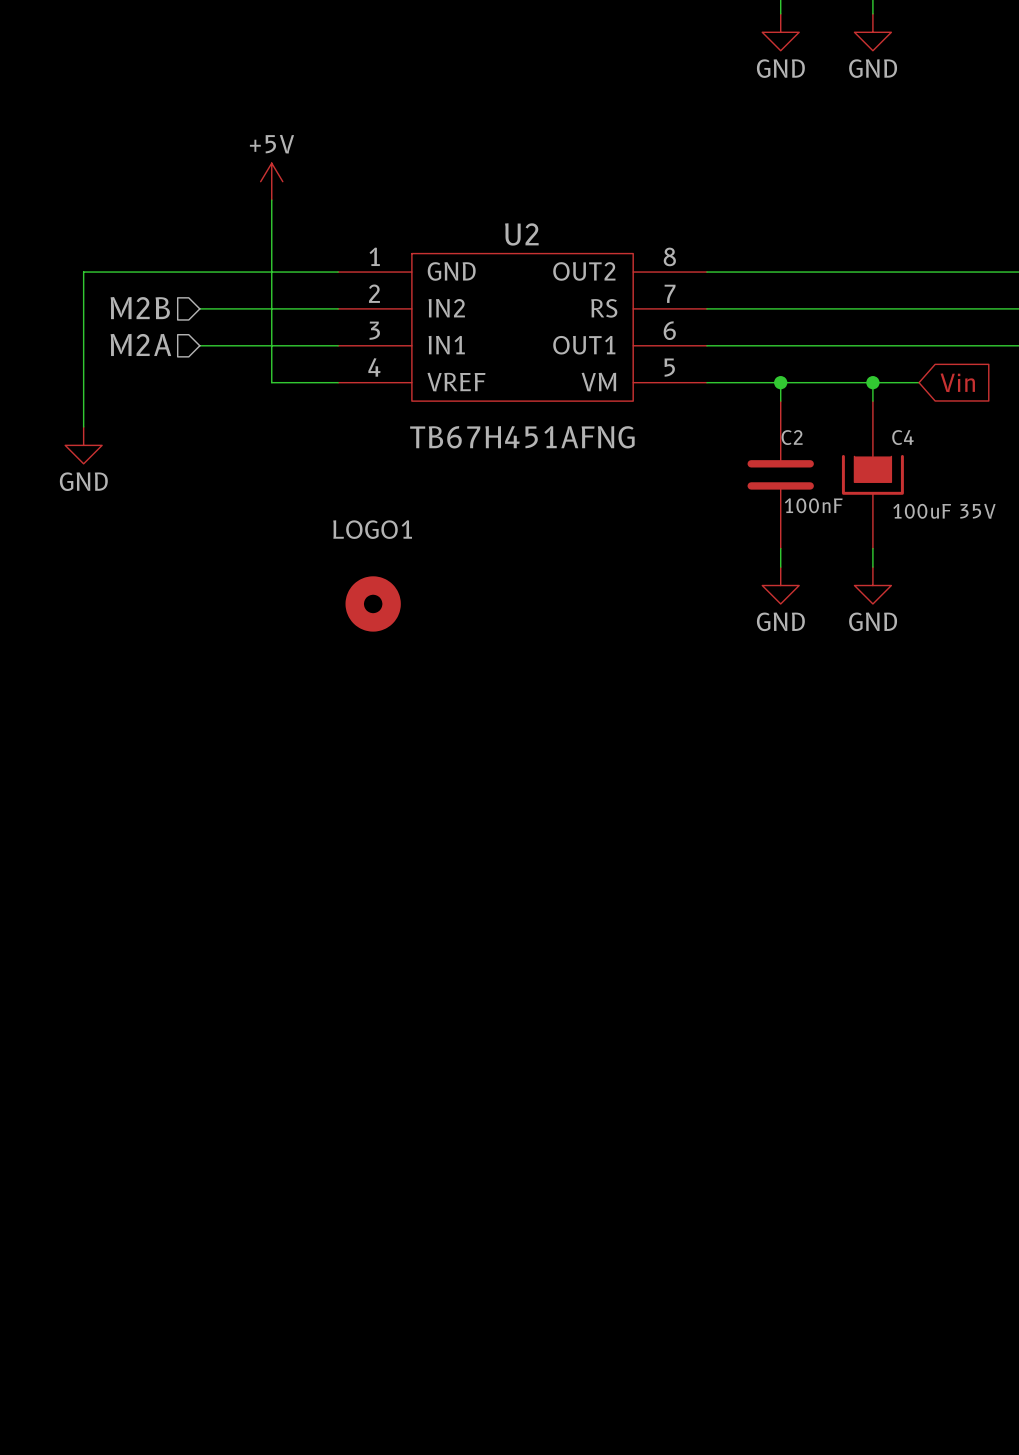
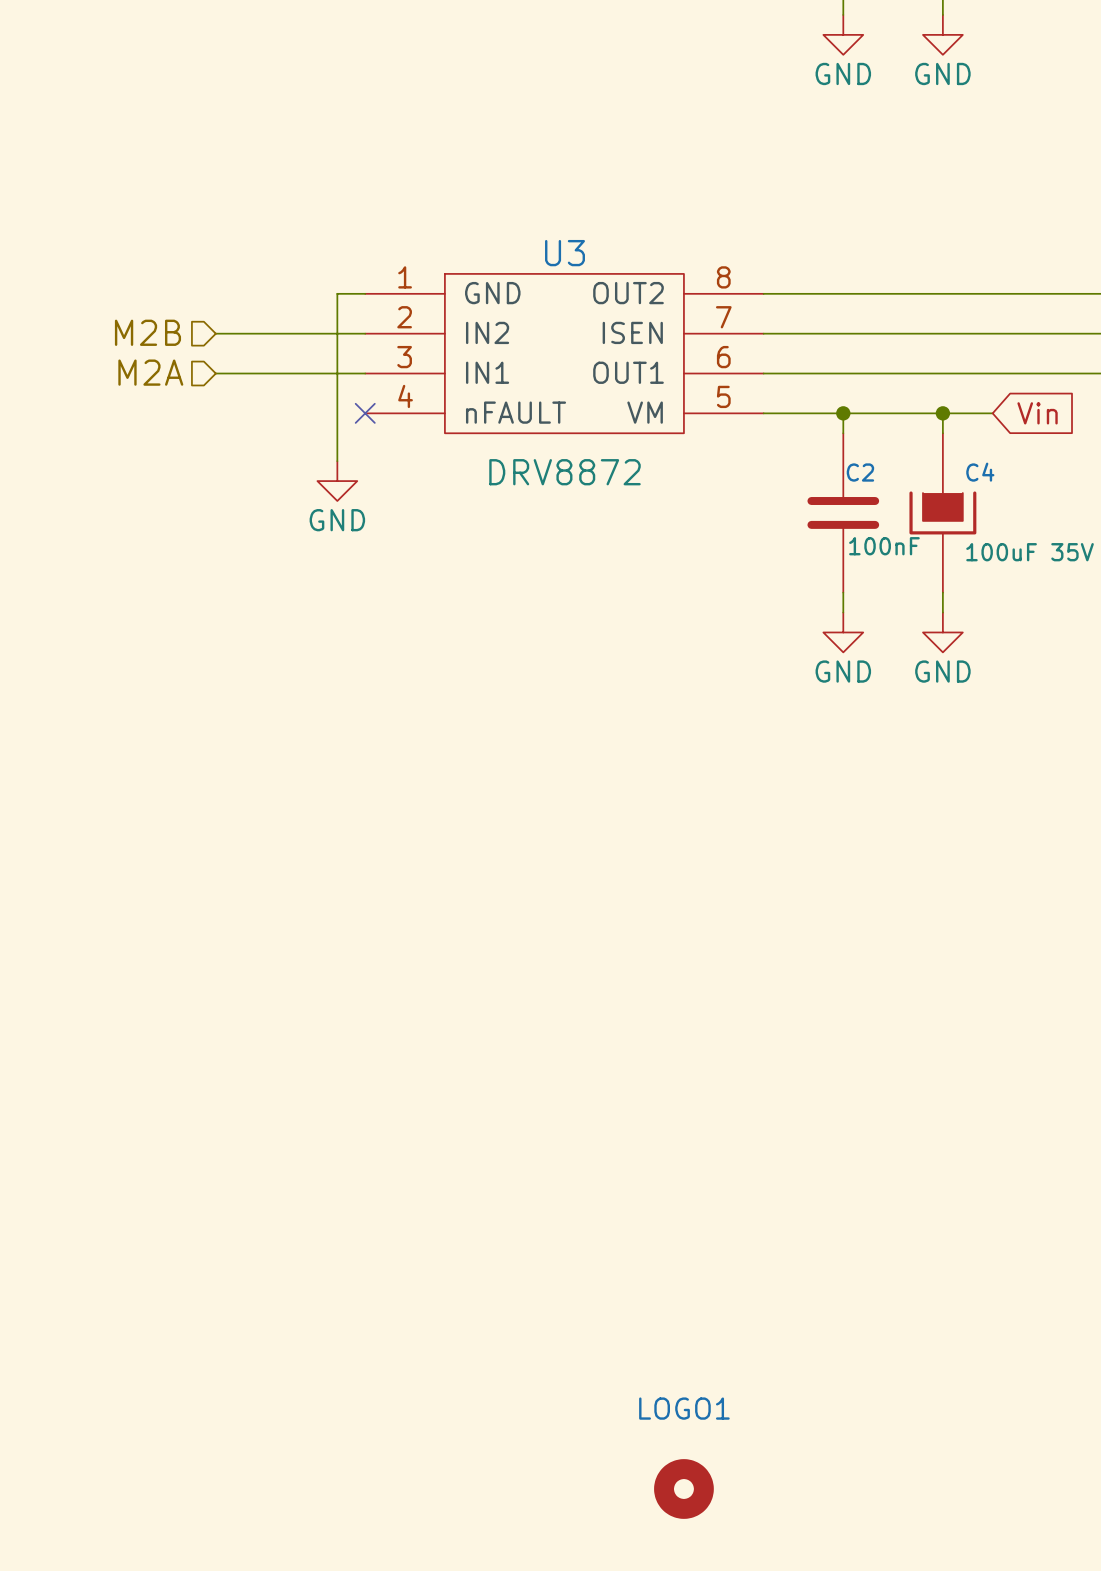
power symbol: +5V (271, 181) -> none
wire: (271, 200) (271, 382) (338, 382) -> none
U2 name: U2 (521, 234) -> U3 (565, 253)
wire: (312, 272) (83, 272) (83, 426) -> (337, 293) (337, 461)
U2 pin name: RS (604, 308) -> ISEN (632, 332)
no-connect mark: none -> (365, 413)
U2 pin name: VREF (456, 382) -> nFAULT (516, 412)
U2 value: TB67H451AFNG (522, 437) -> DRV8872 (565, 472)
power symbol position: GND (83, 445) -> GND (337, 481)
LOGO1 position: (373, 603) -> (683, 1488)

